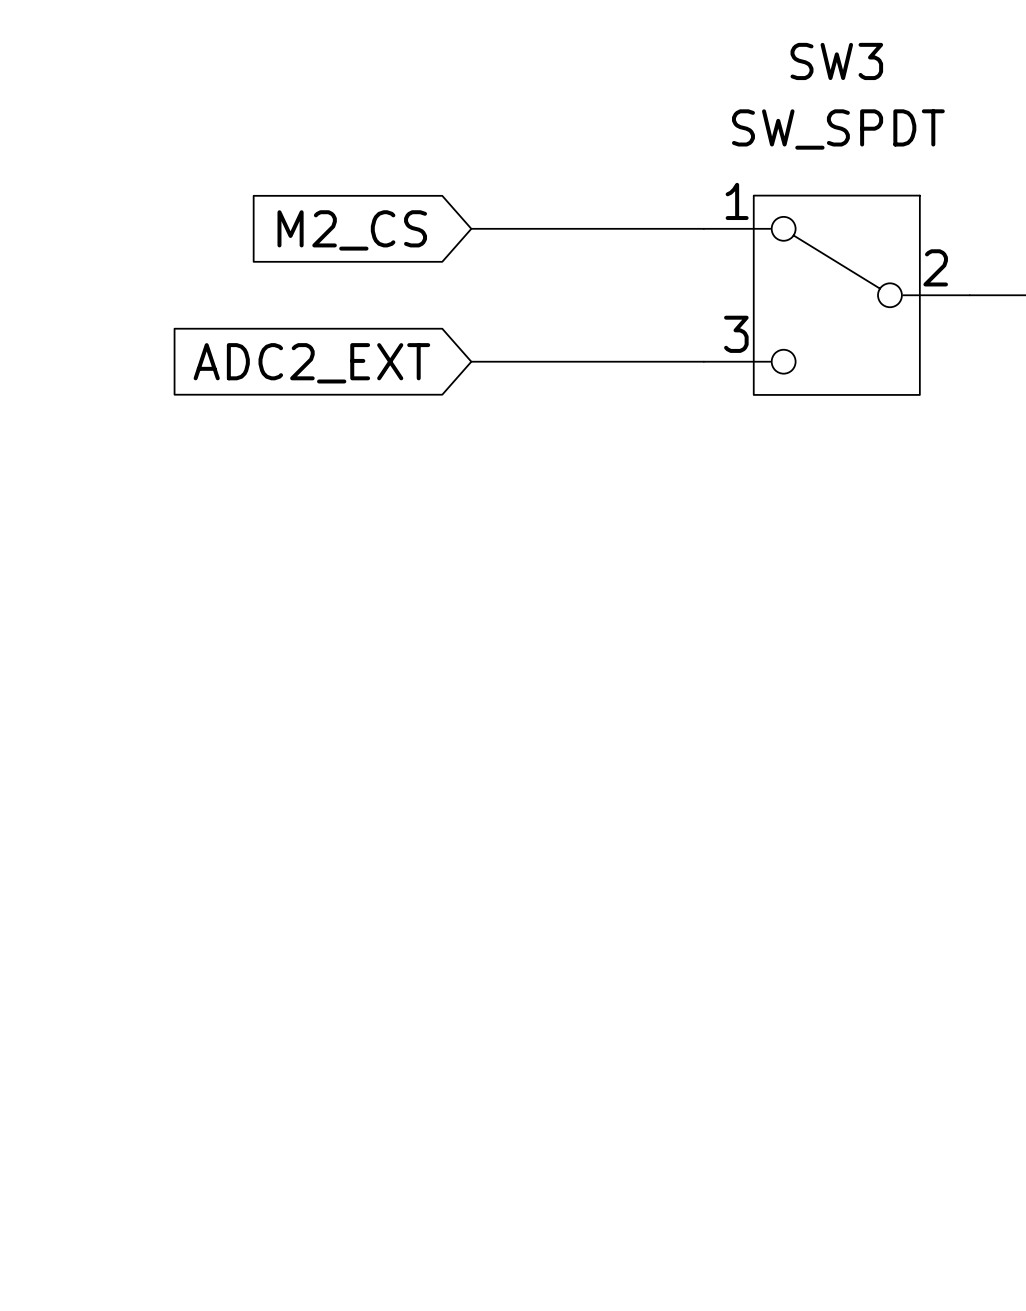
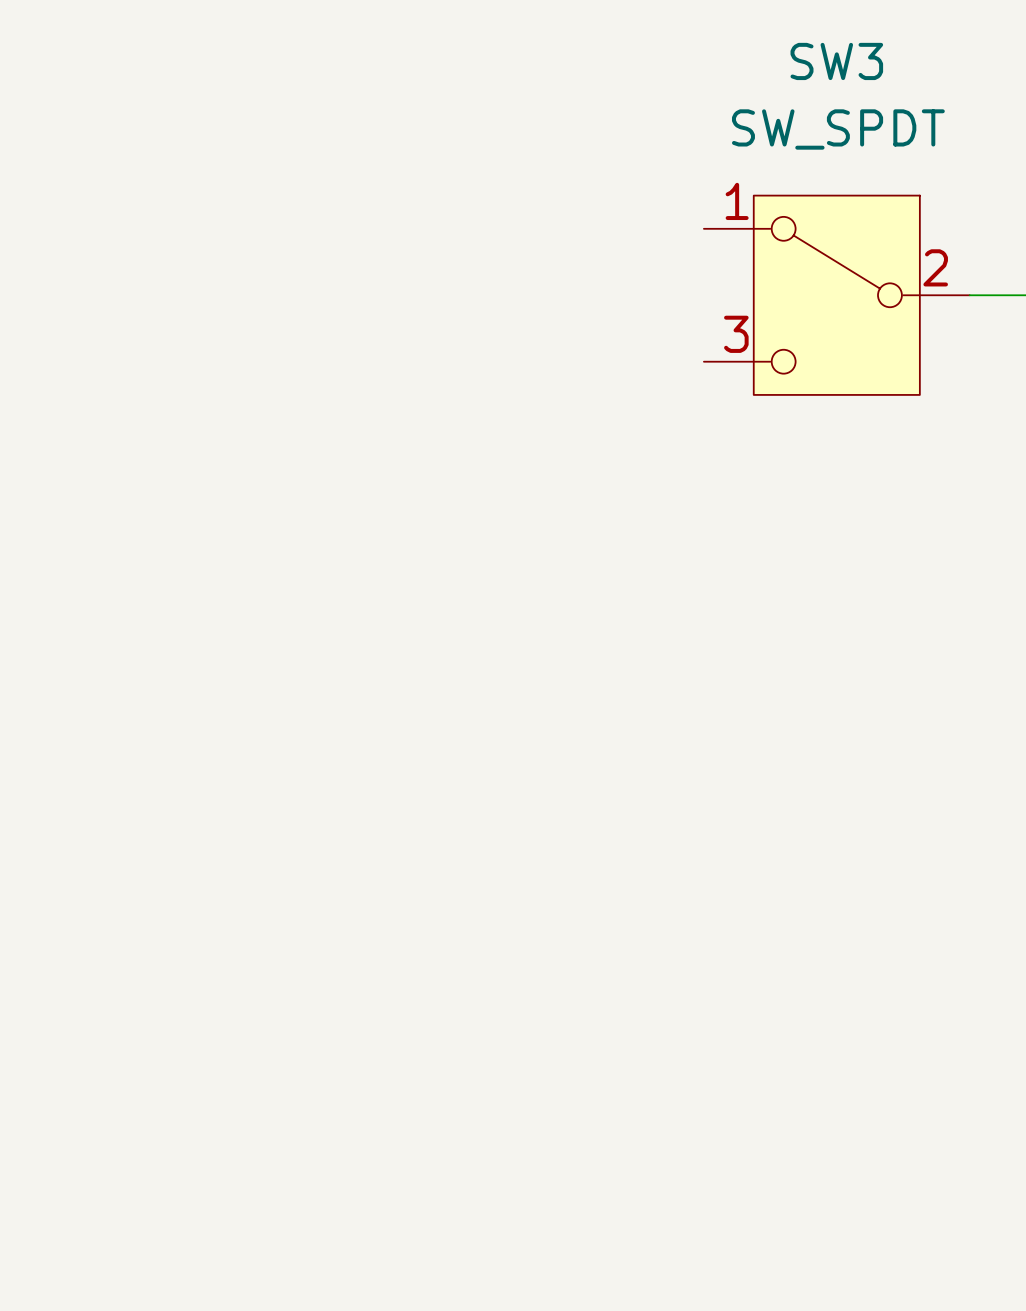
wire: (471, 228) (703, 228) -> none
global label: M2_CS (352, 230) -> none
wire: (471, 361) (703, 361) -> none
global label: ADC2_EXT (311, 363) -> none

